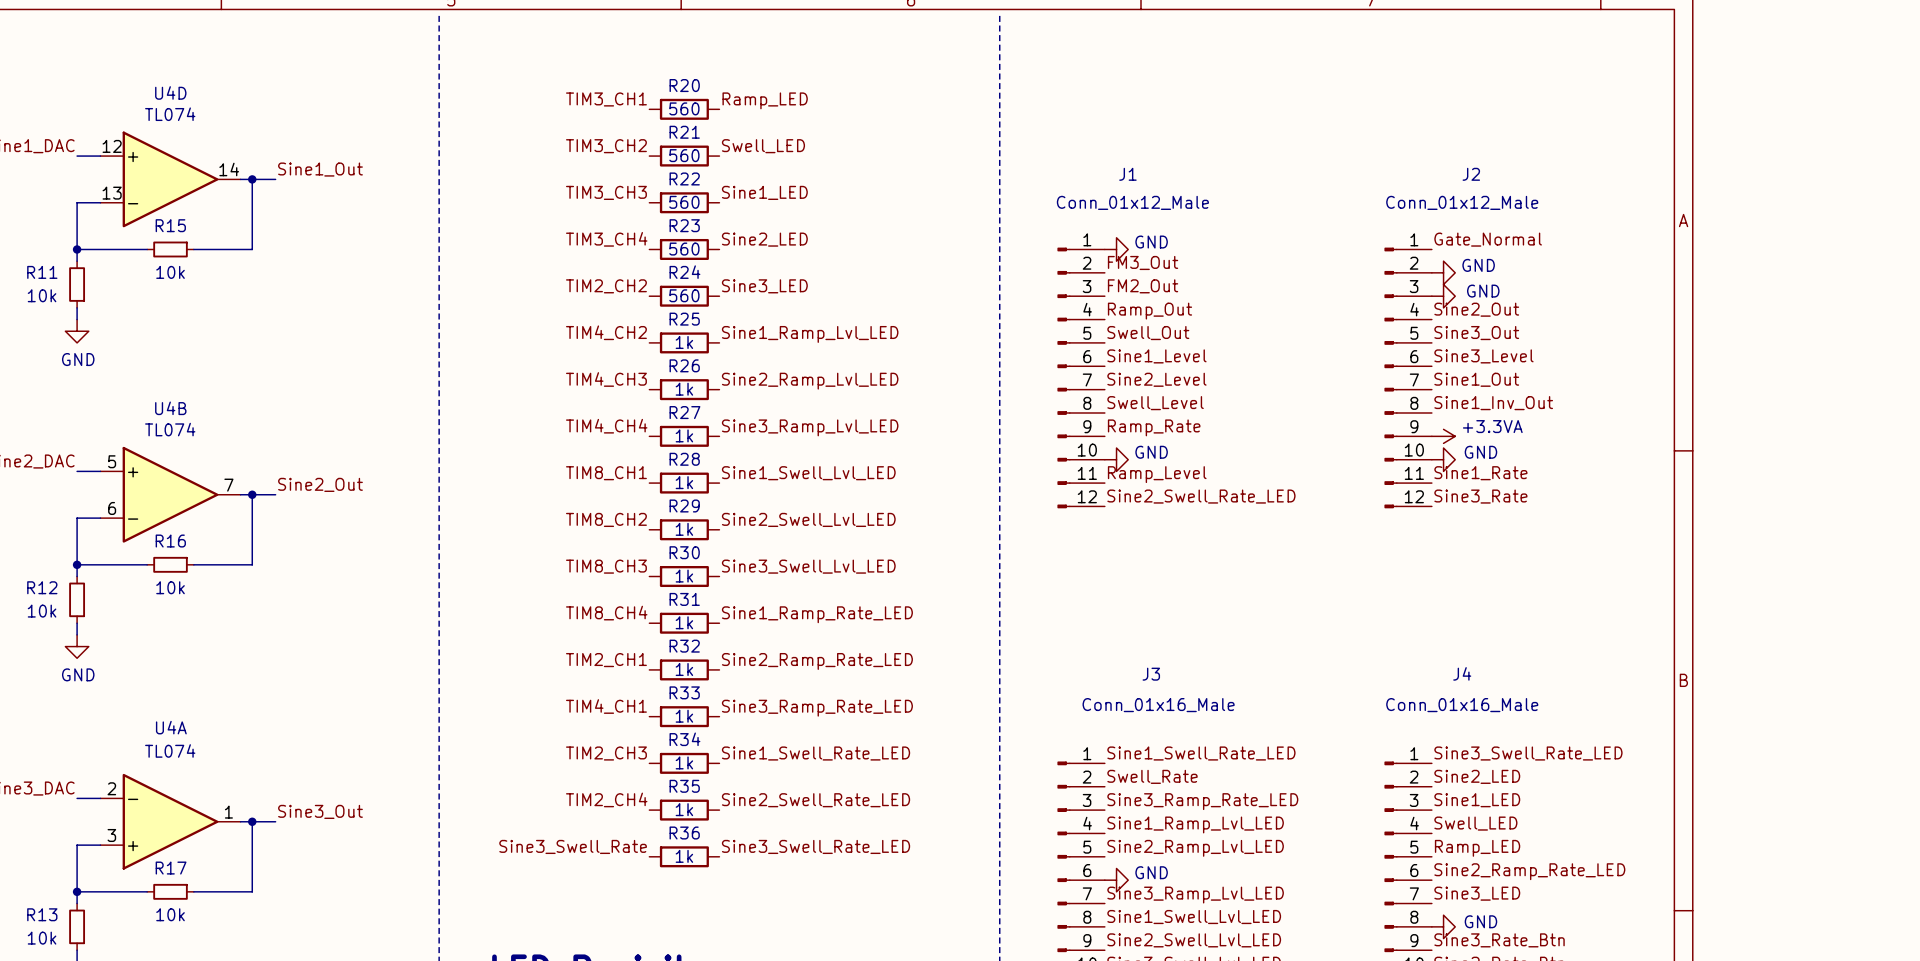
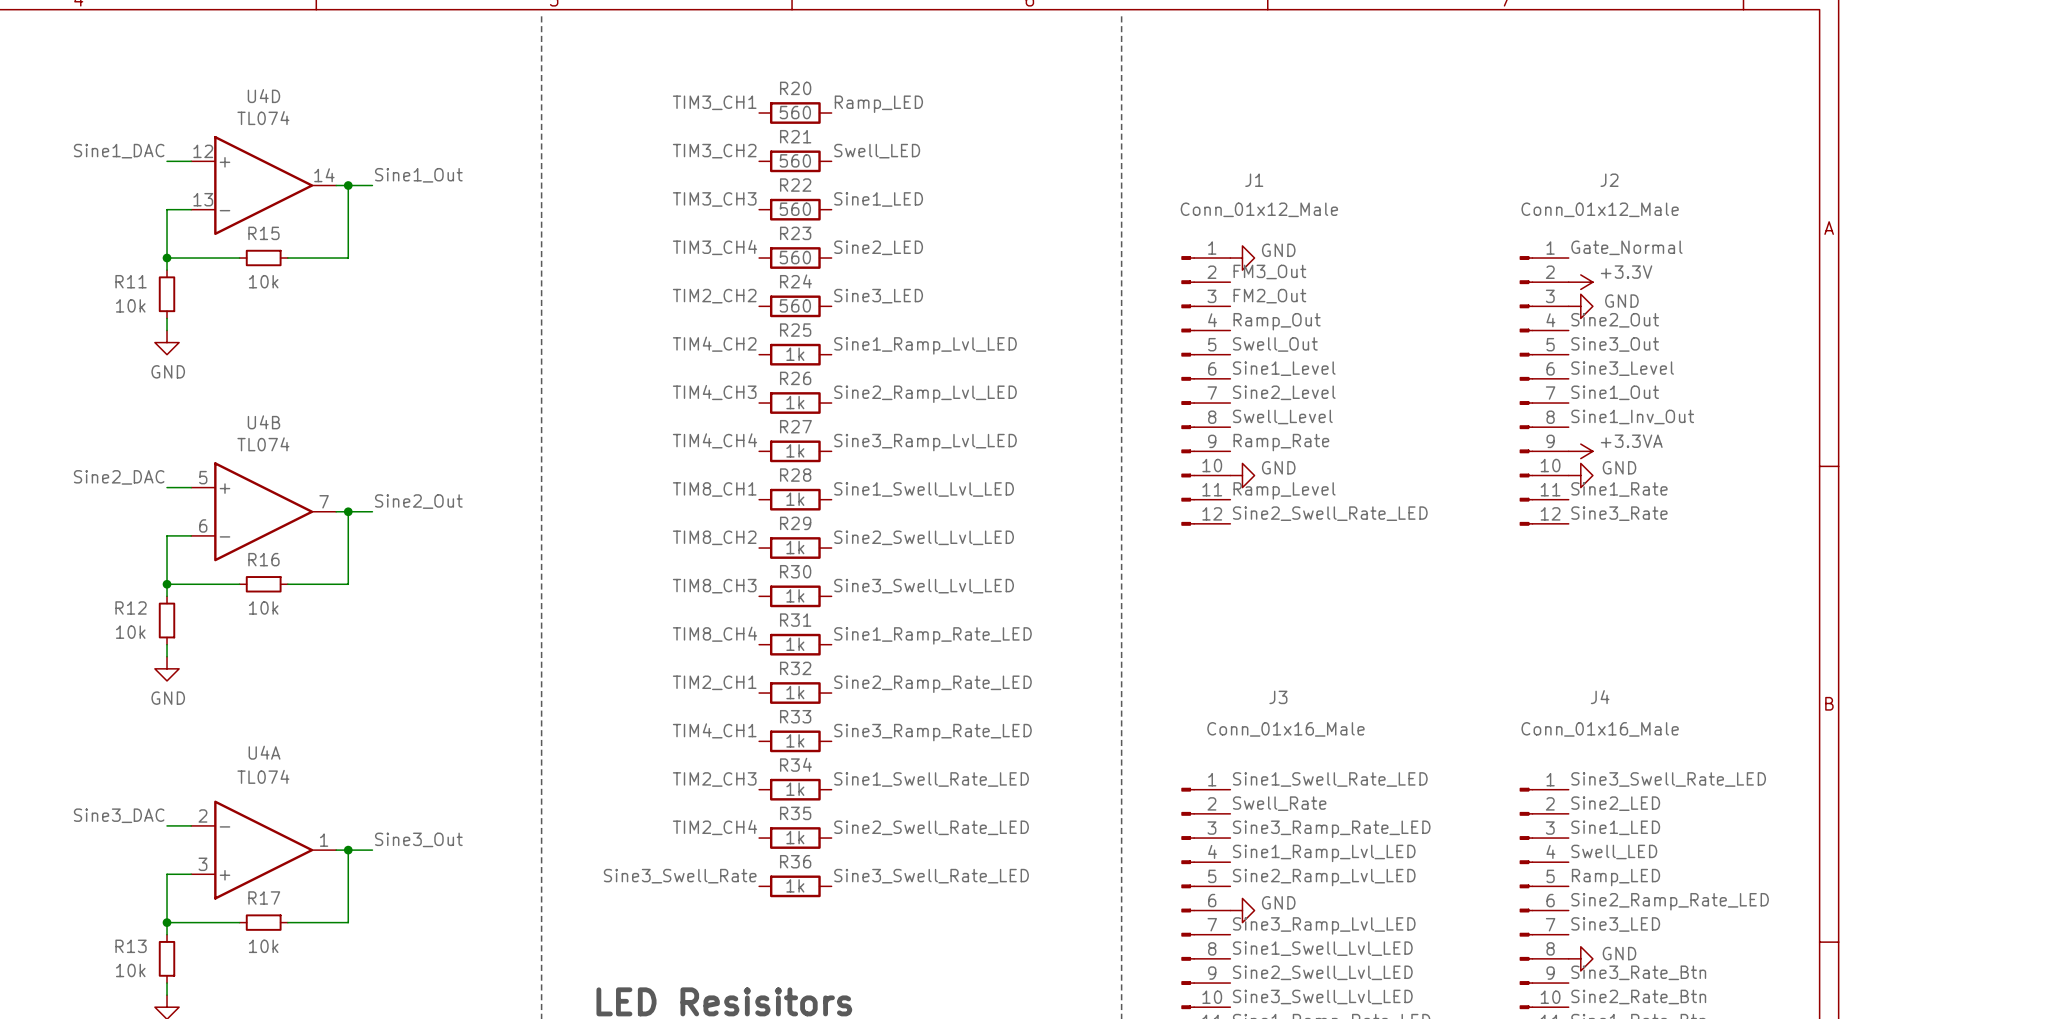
power symbol: GND (1443, 272) -> +3.3V (1580, 282)

